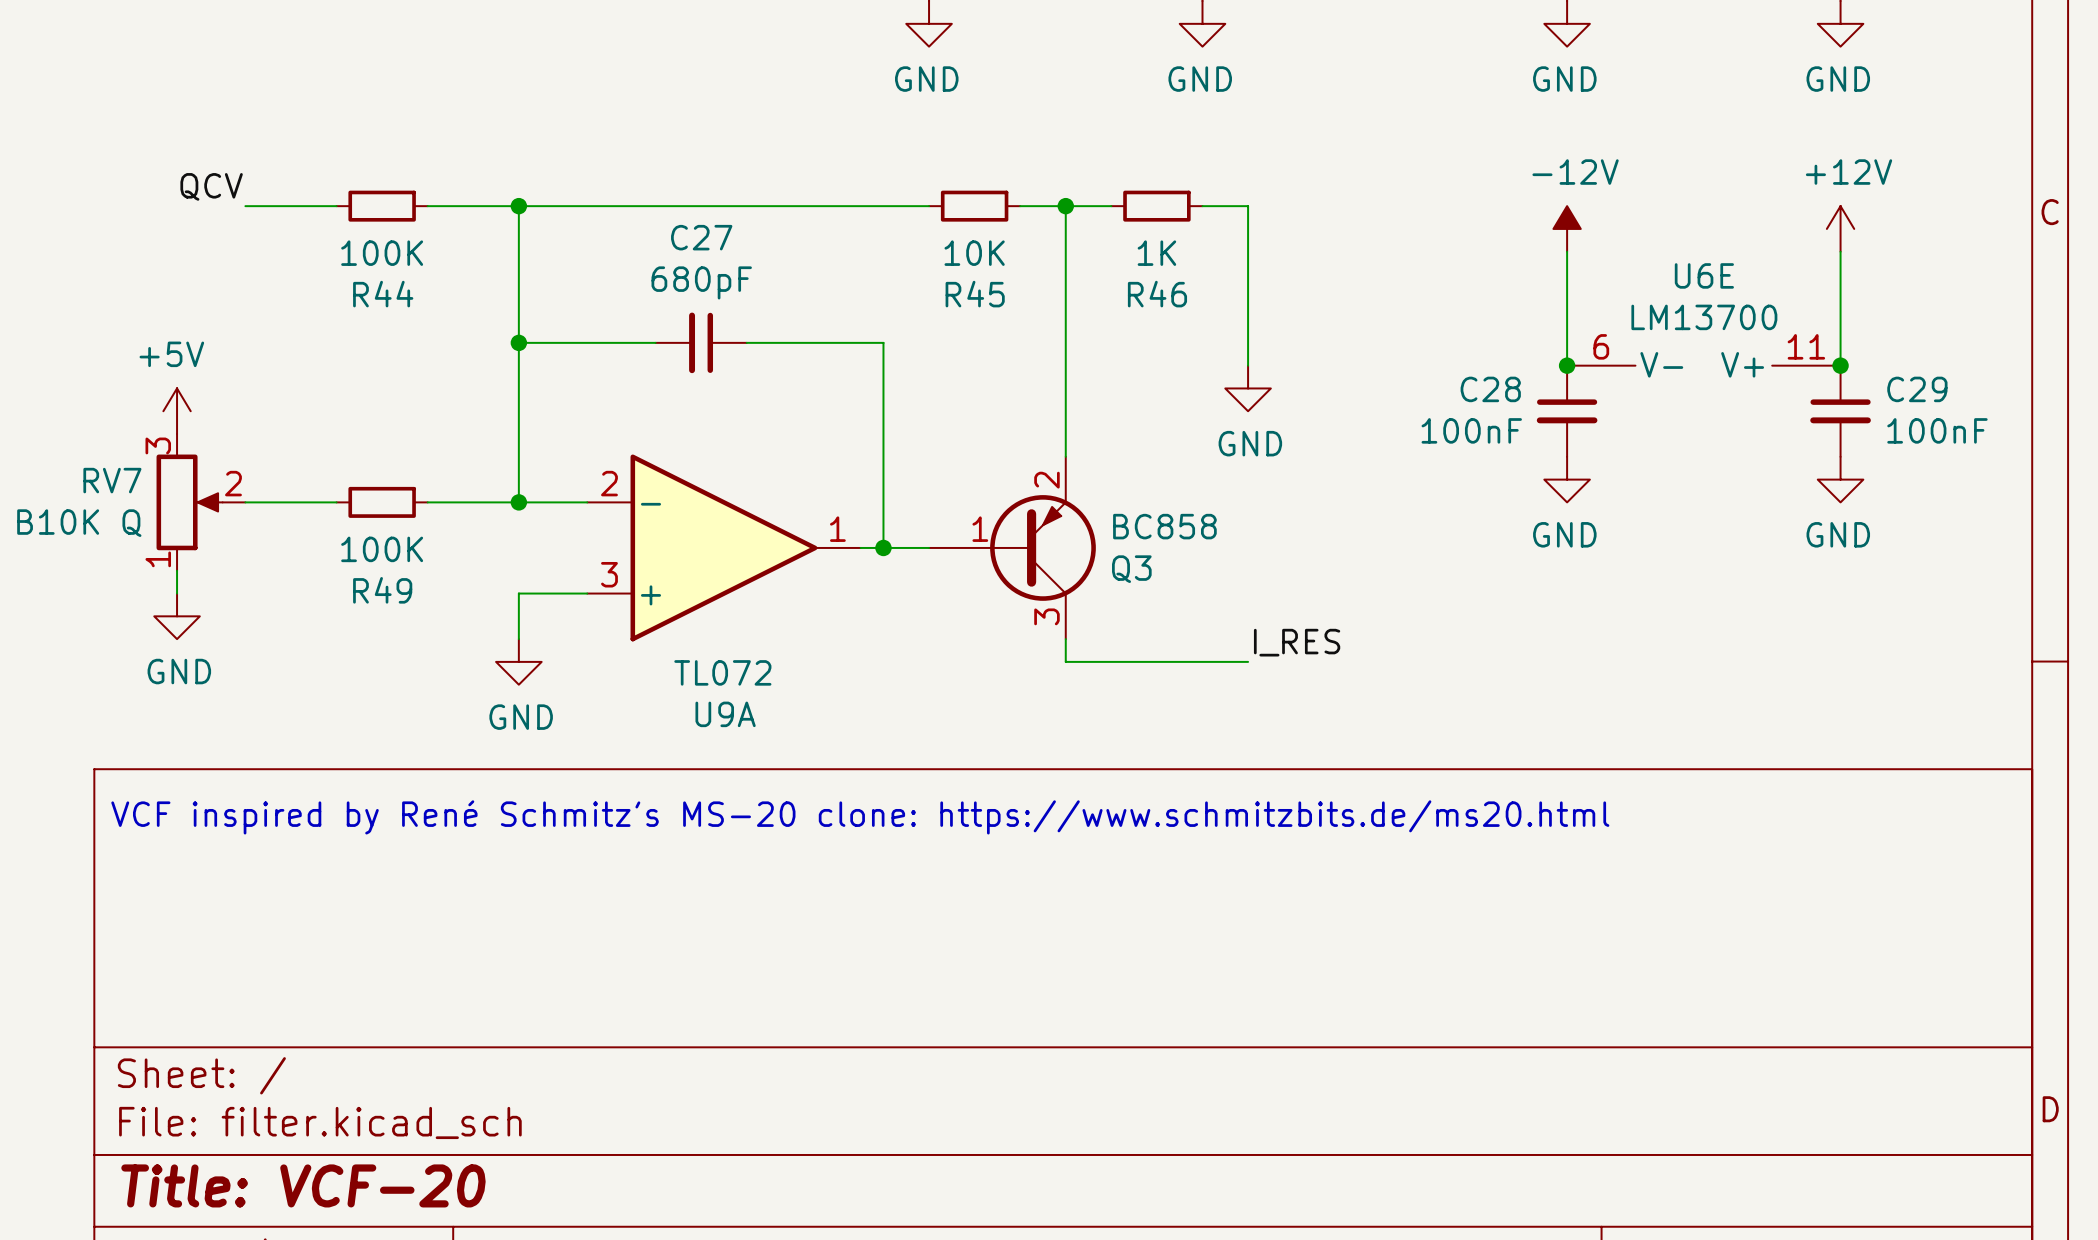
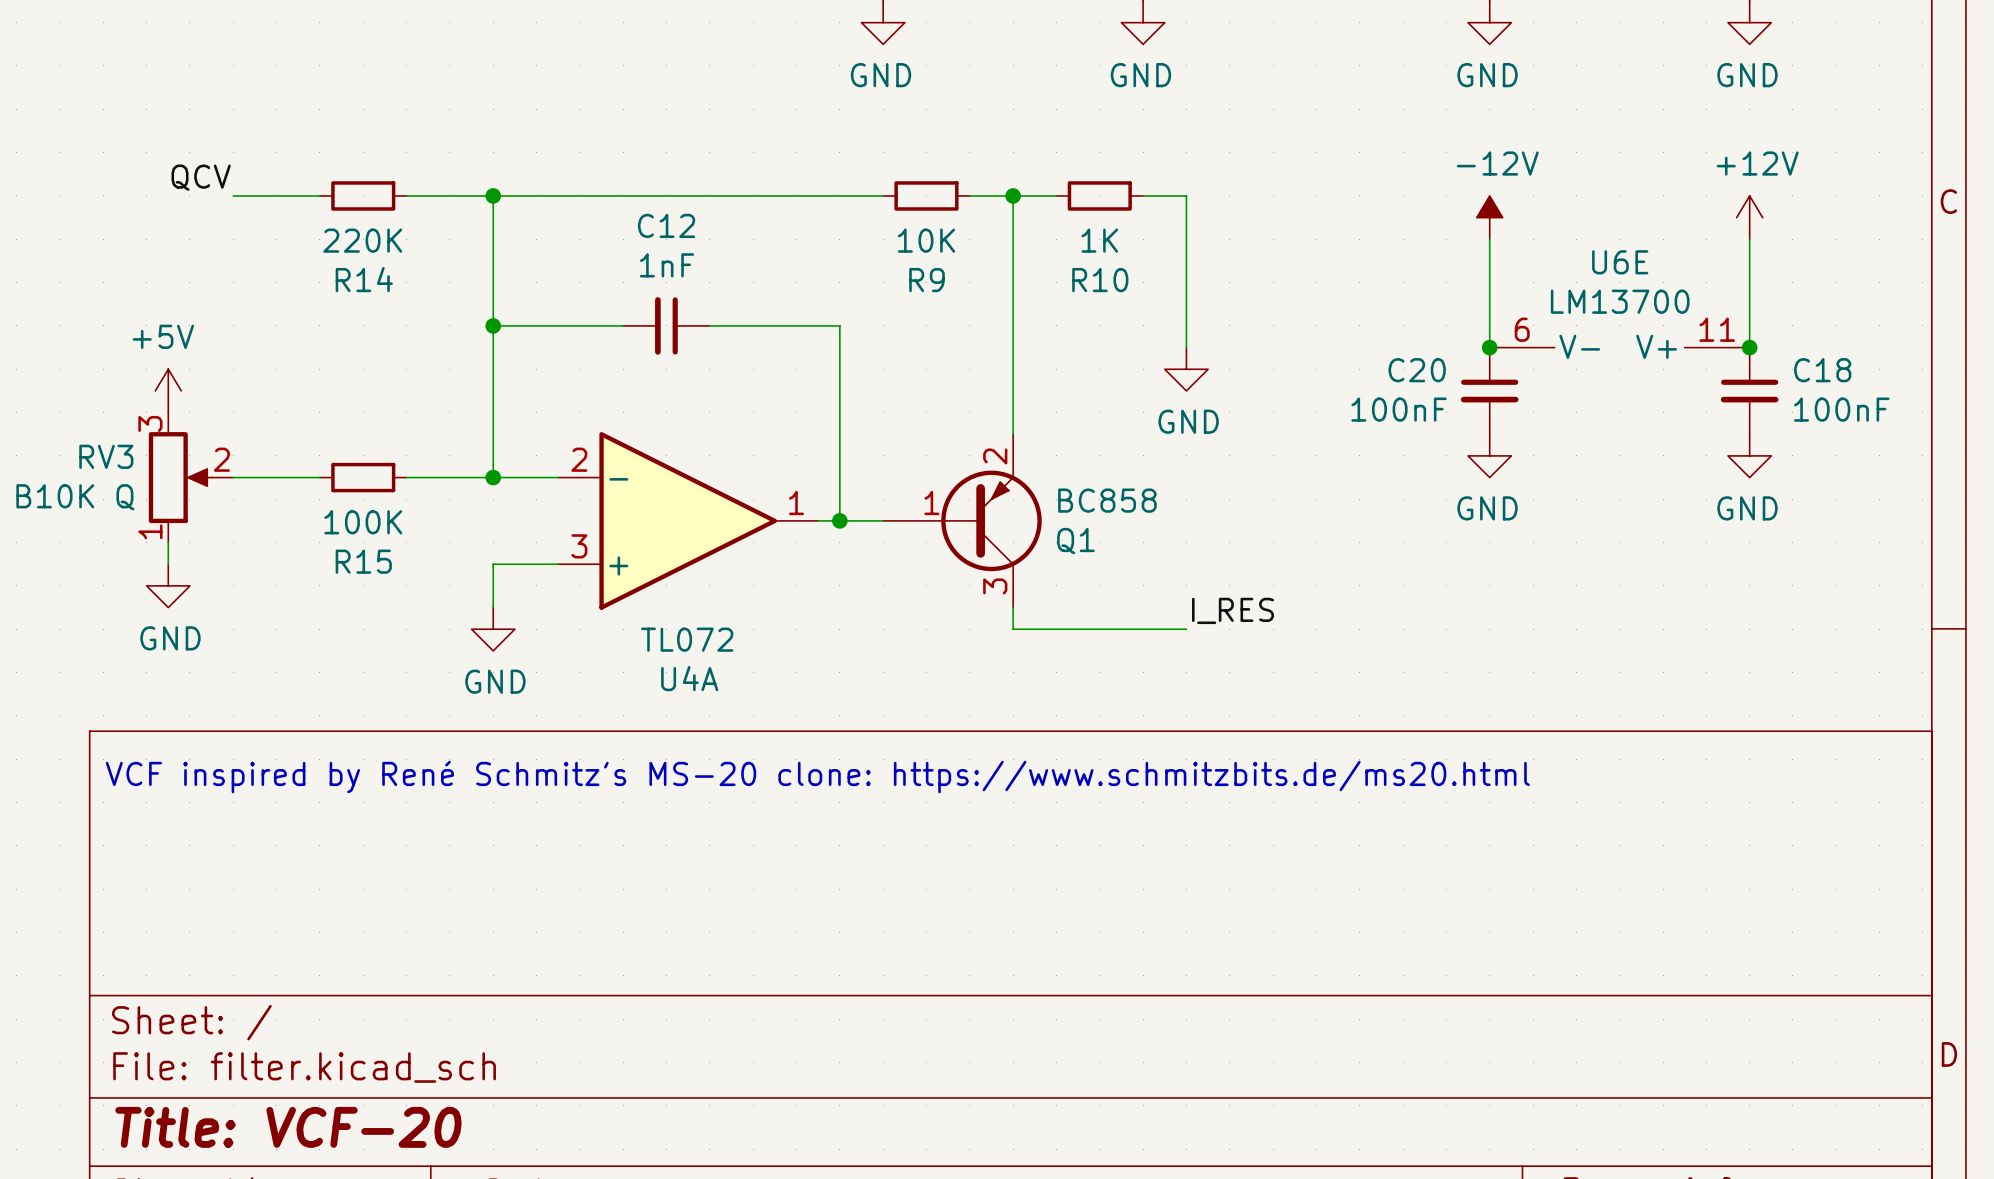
C27 name: C27 (701, 237) -> C12 (666, 225)
R44 value: 100K (382, 253) -> 220K (362, 240)
C27 value: 680pF (701, 282) -> 1nF (667, 265)
R44 name: R44 (383, 294) -> R14 (364, 279)
R45 name: R45 (975, 294) -> R9 (927, 280)
R46 name: R46 (1157, 294) -> R10 (1100, 280)
C28 name: C28 (1490, 389) -> C20 (1417, 370)
C29 name: C29 (1917, 389) -> C18 (1822, 370)
RV7 name: RV7 (112, 480) -> RV3 (106, 456)
Q3 name: Q3 (1131, 569) -> Q1 (1075, 541)
R49 name: R49 (382, 590) -> R15 (363, 561)
U9A name: U9A (725, 714) -> U4A (689, 678)

